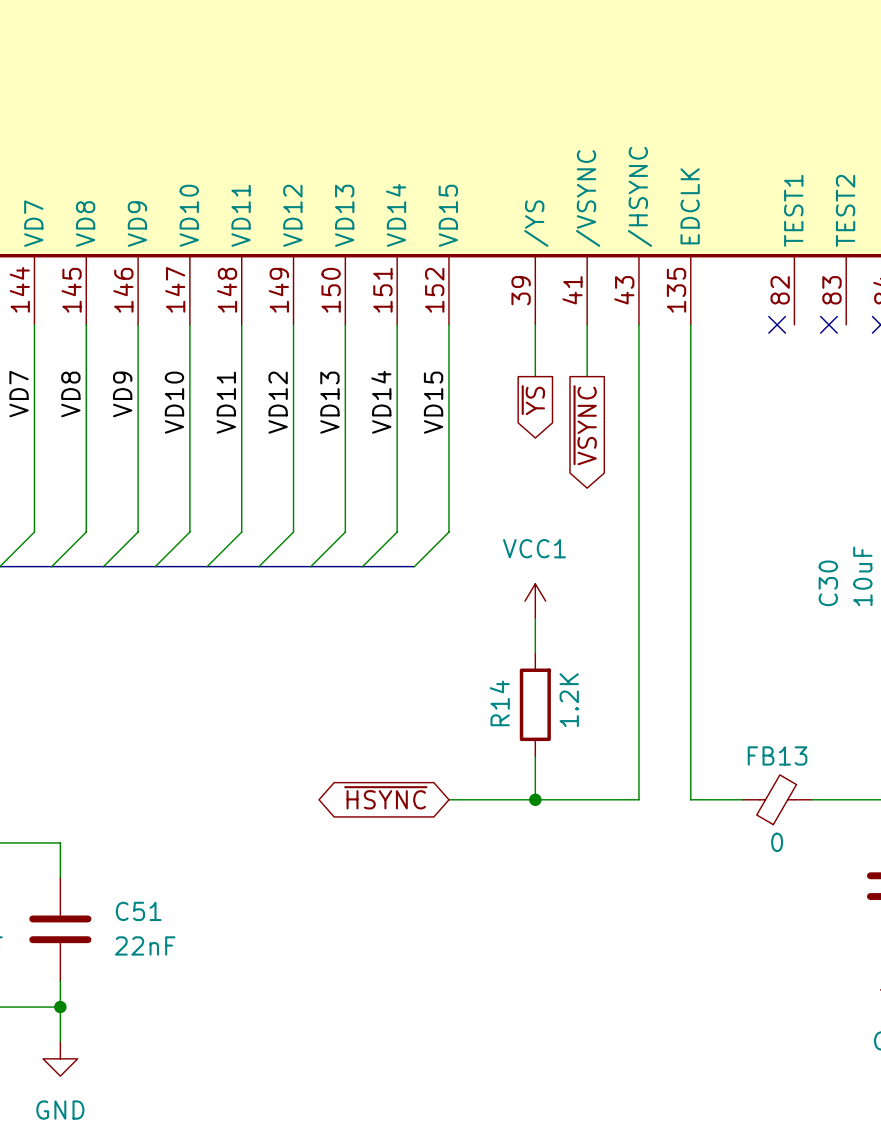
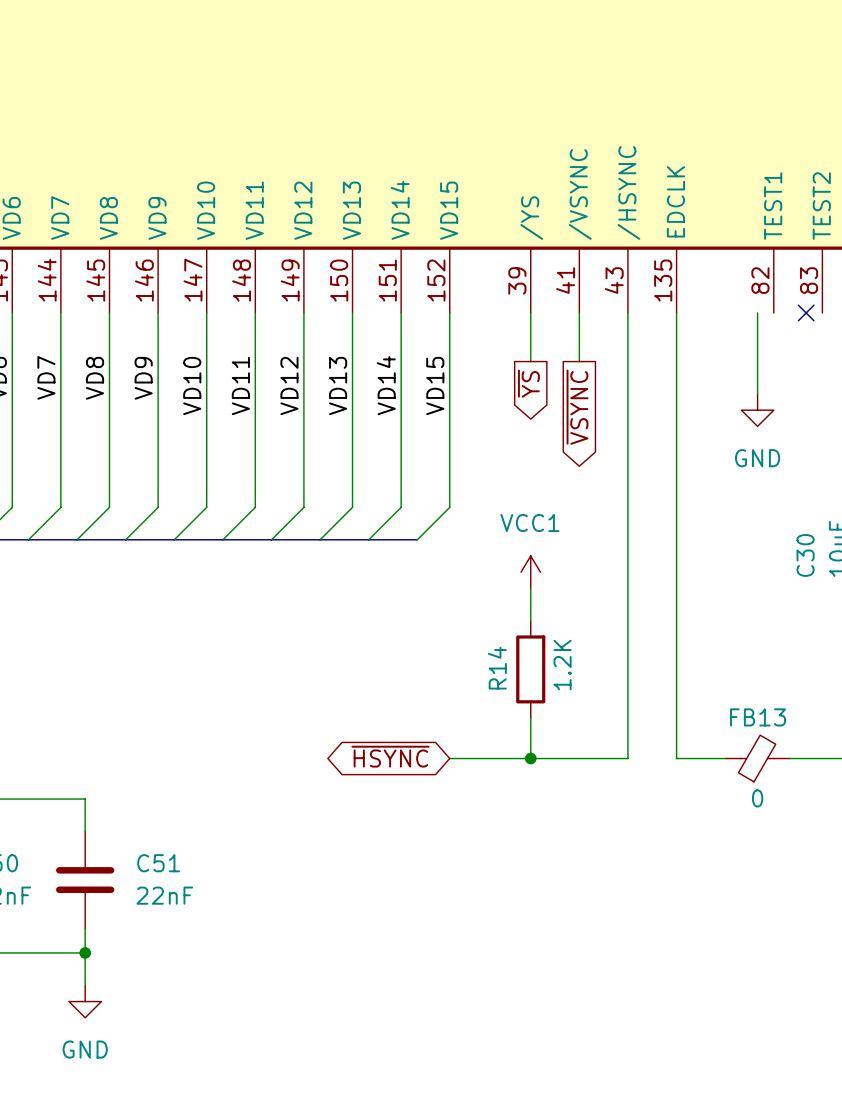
wire: none -> (757, 312) (757, 393)
no-connect mark: (777, 324) -> none
power symbol: none -> GND (757, 410)

